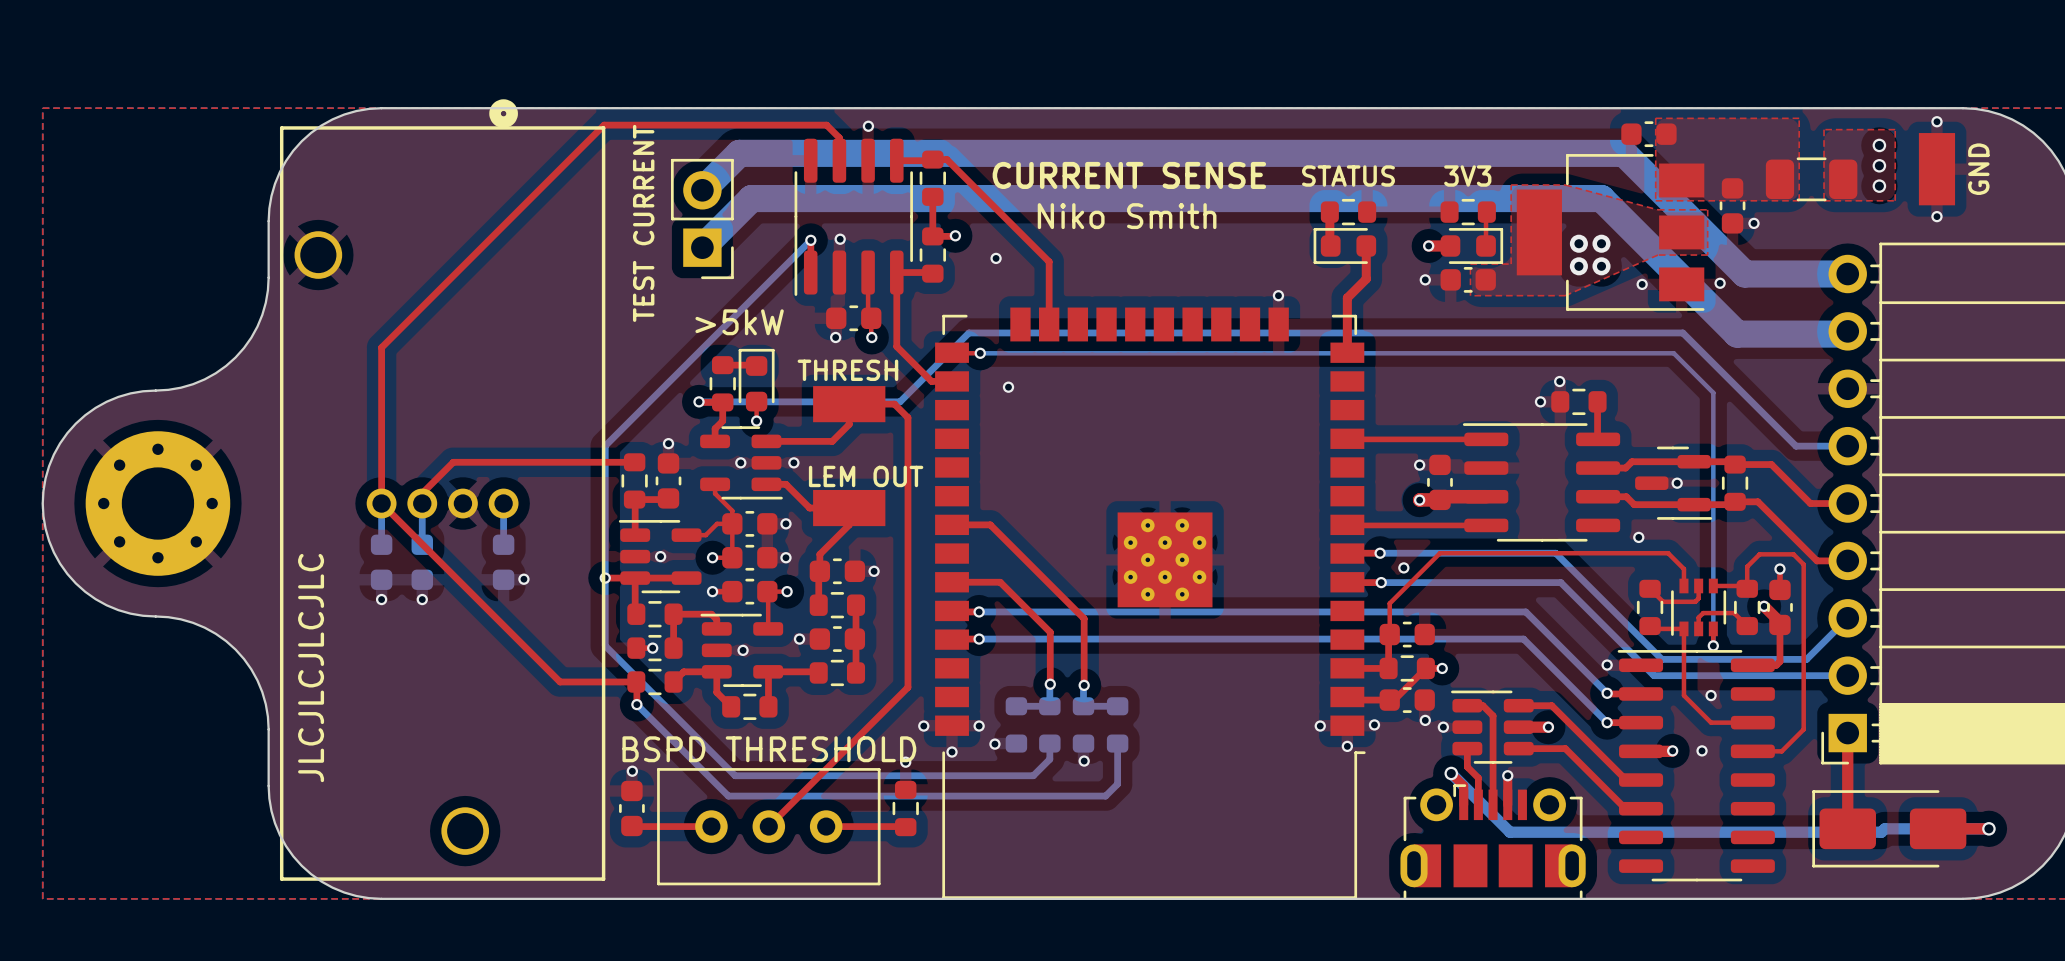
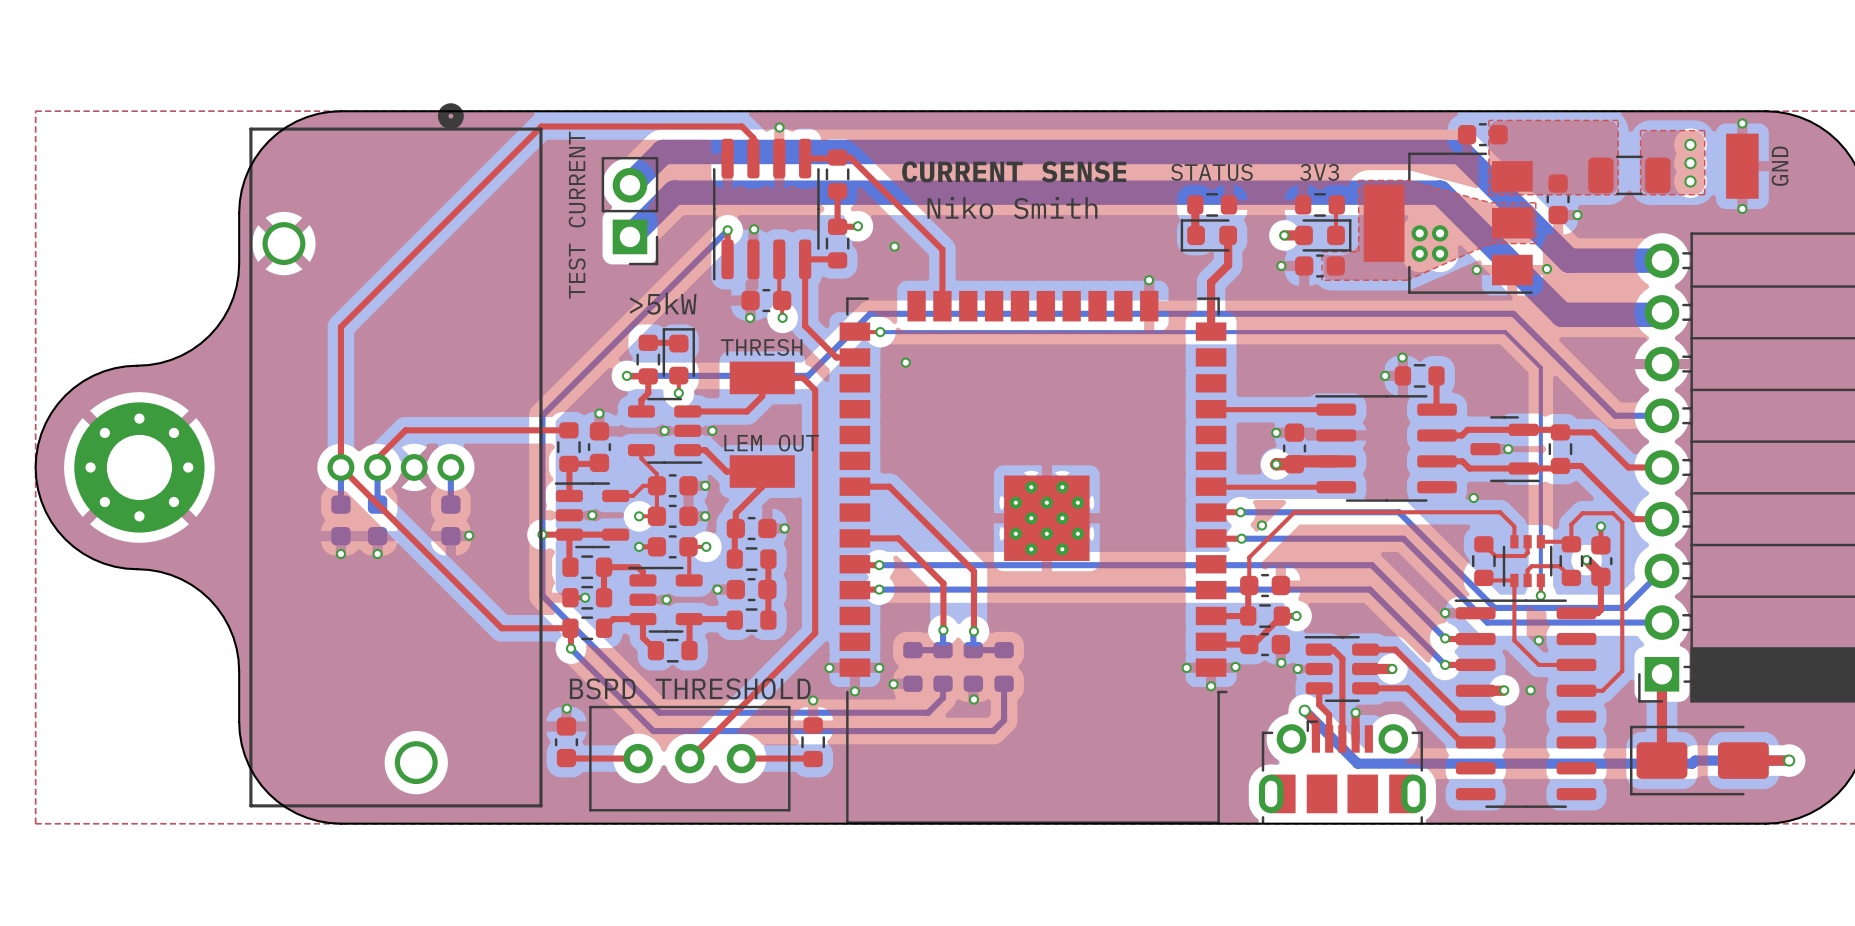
text: JLCJLCJLCJLC (311, 668) -> none

